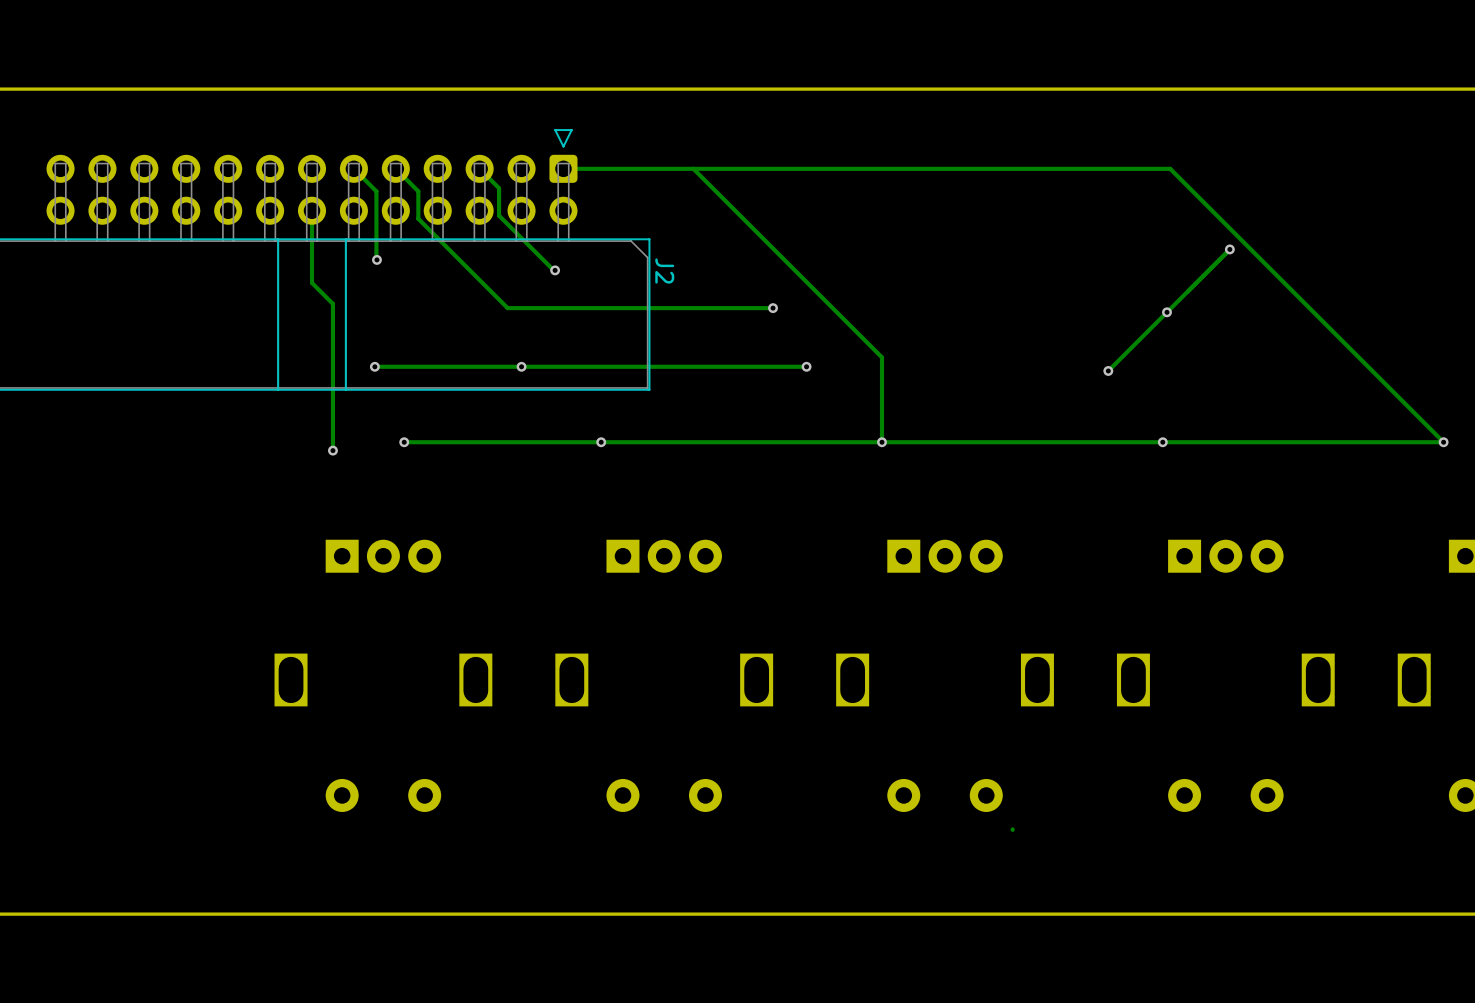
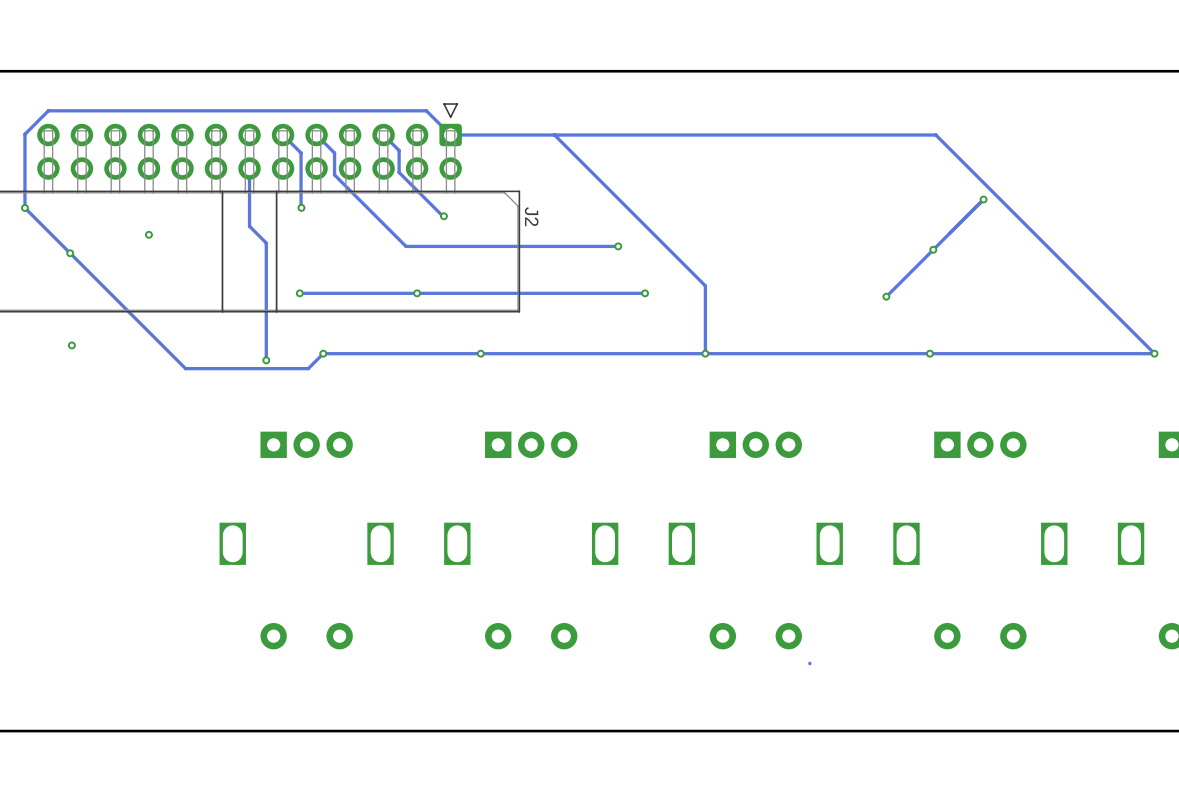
track: none -> (450, 135) (426, 110) (48, 110) (24, 134) (24, 208) (185, 368) (308, 368) (323, 353)
via: none -> (24, 208)
via: none -> (148, 234)
via: none -> (70, 253)
via: none -> (71, 345)

